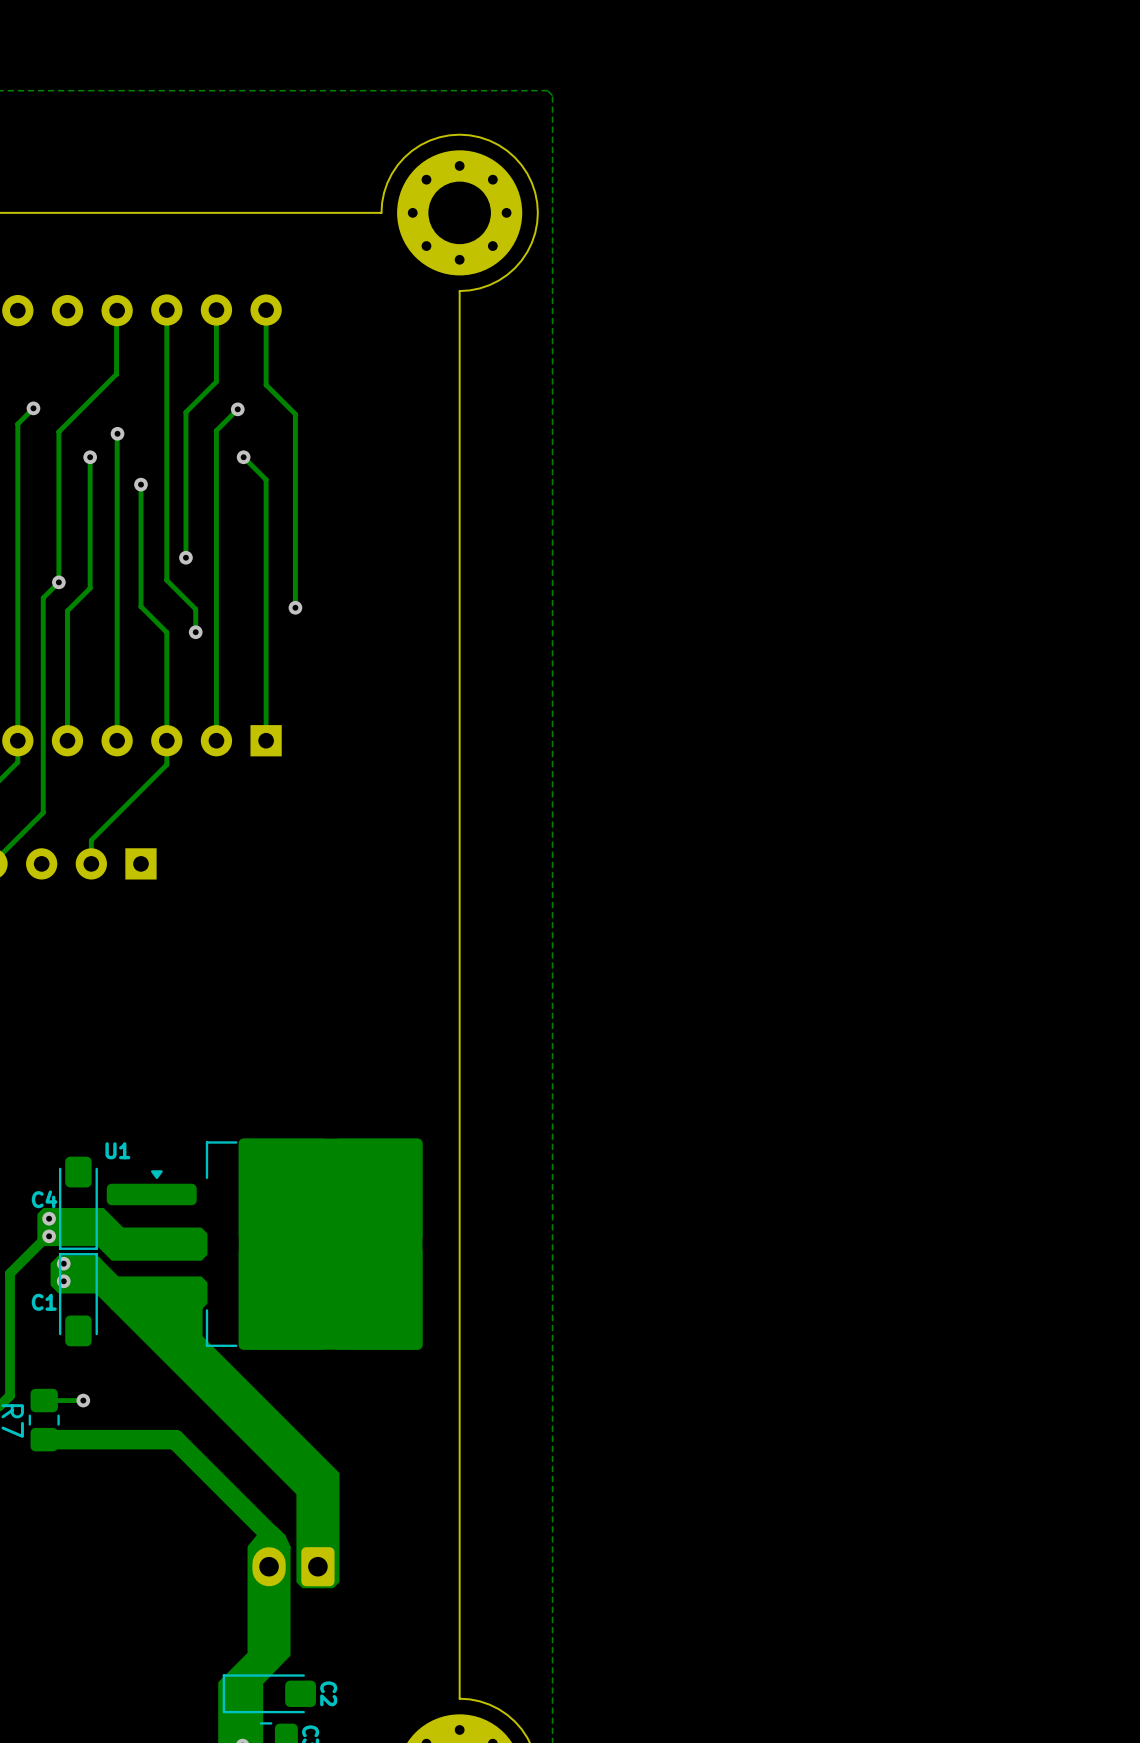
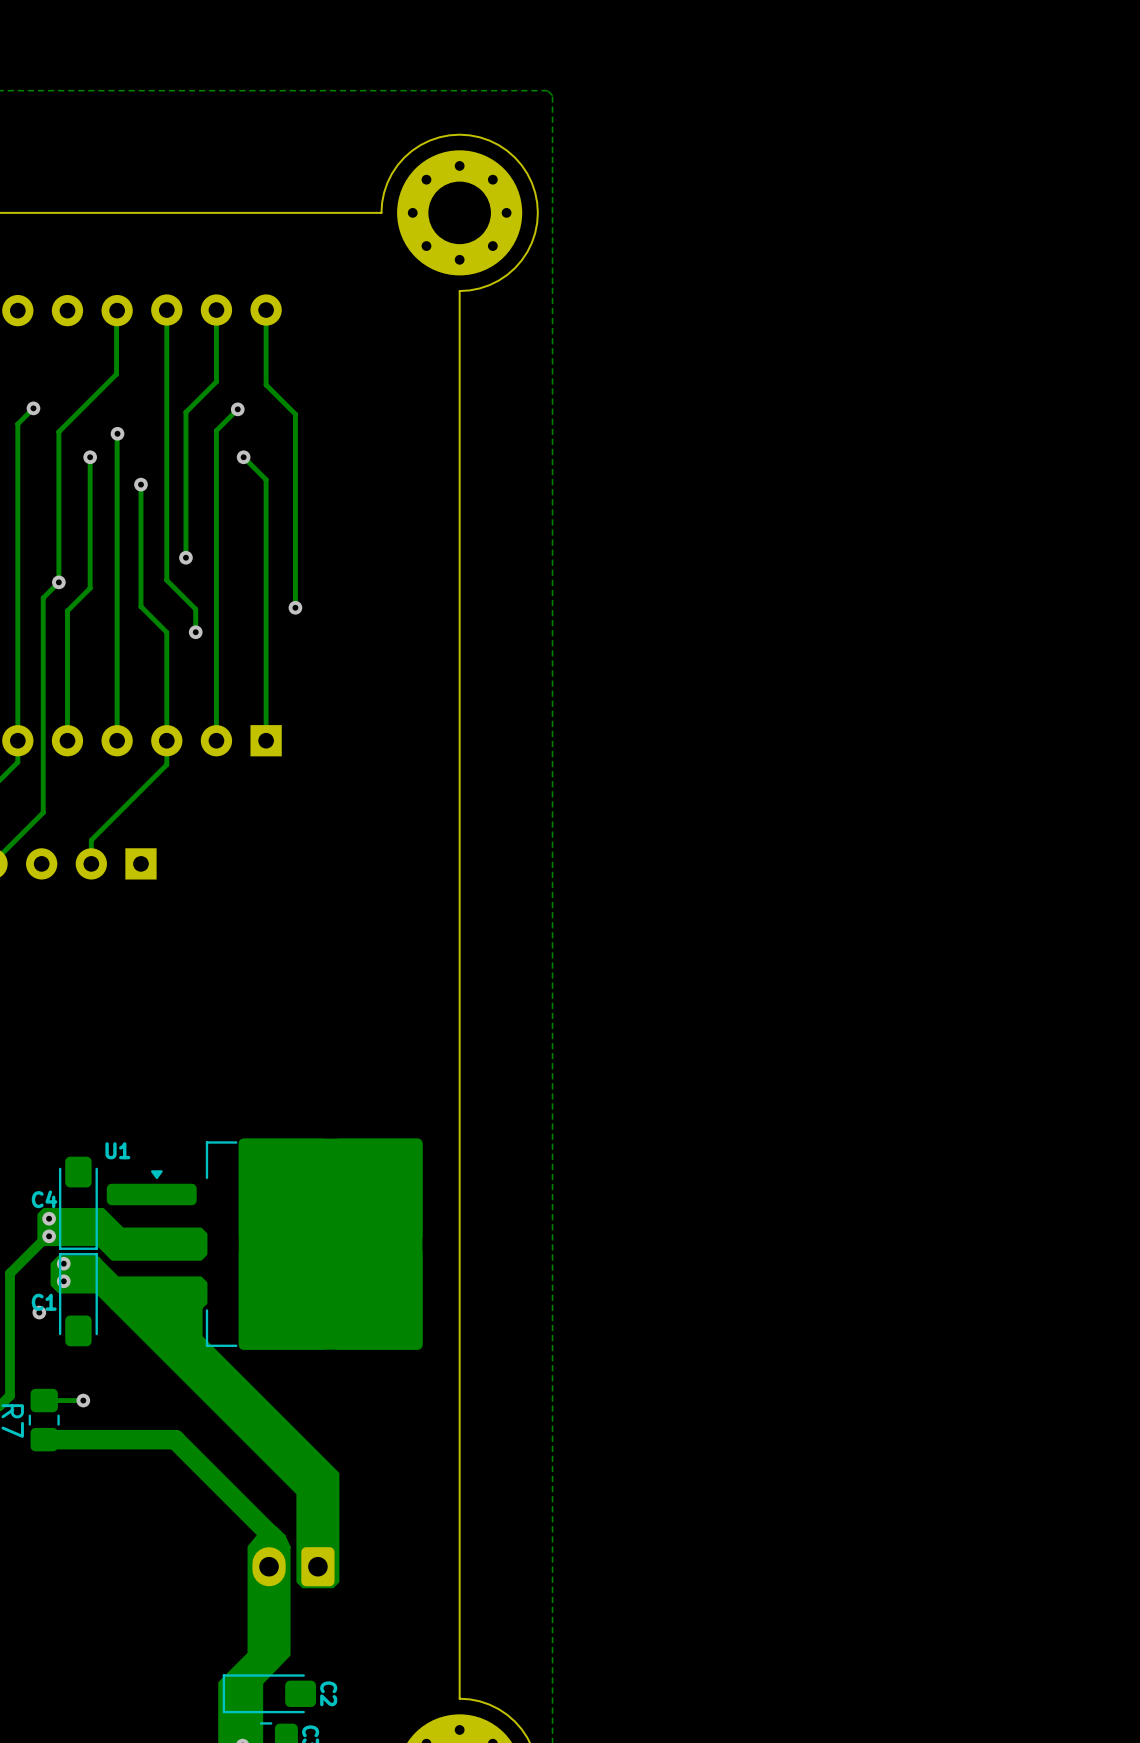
via: none -> (39, 1312)

